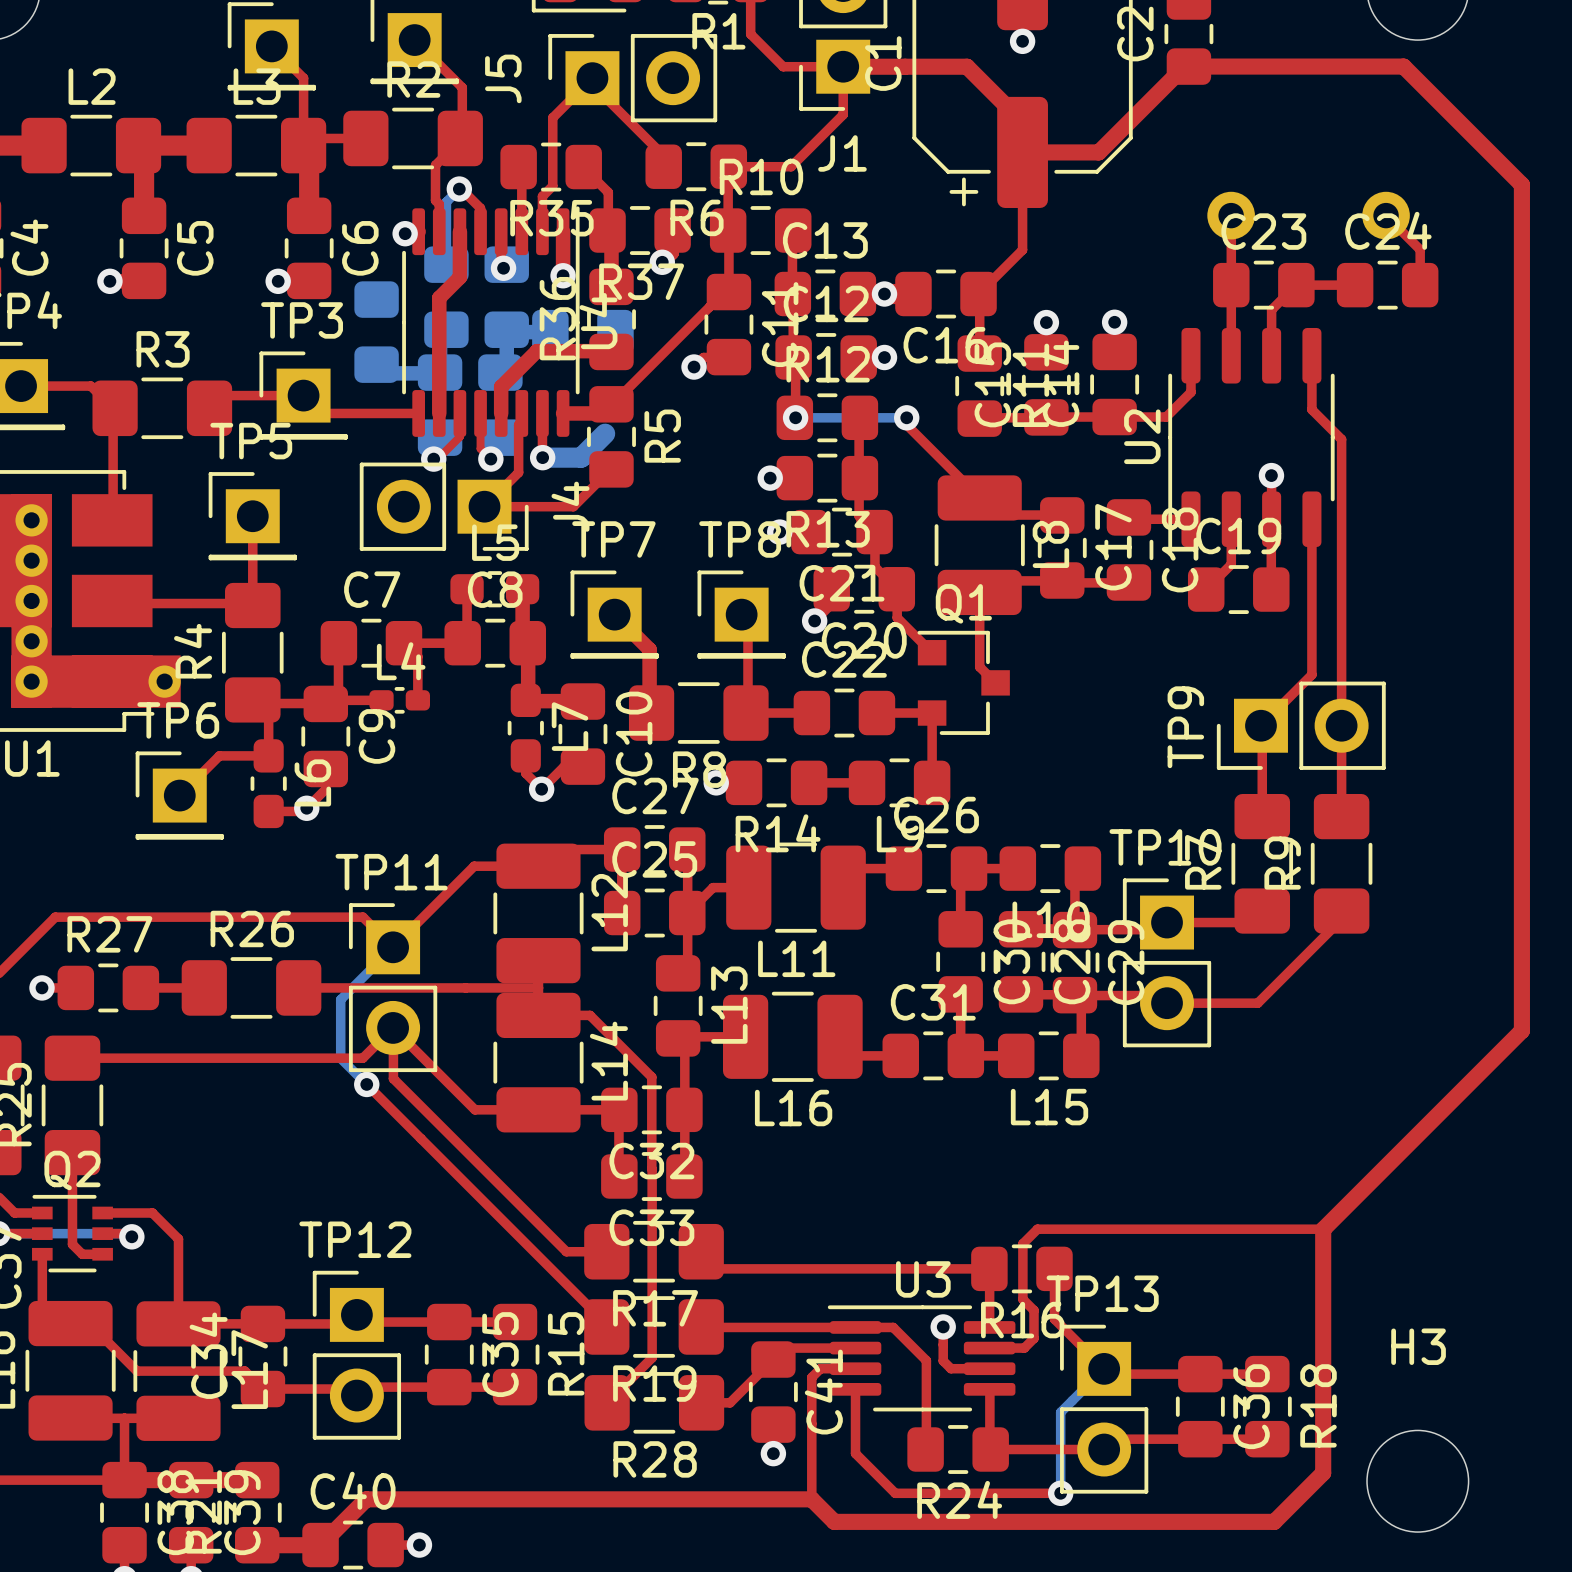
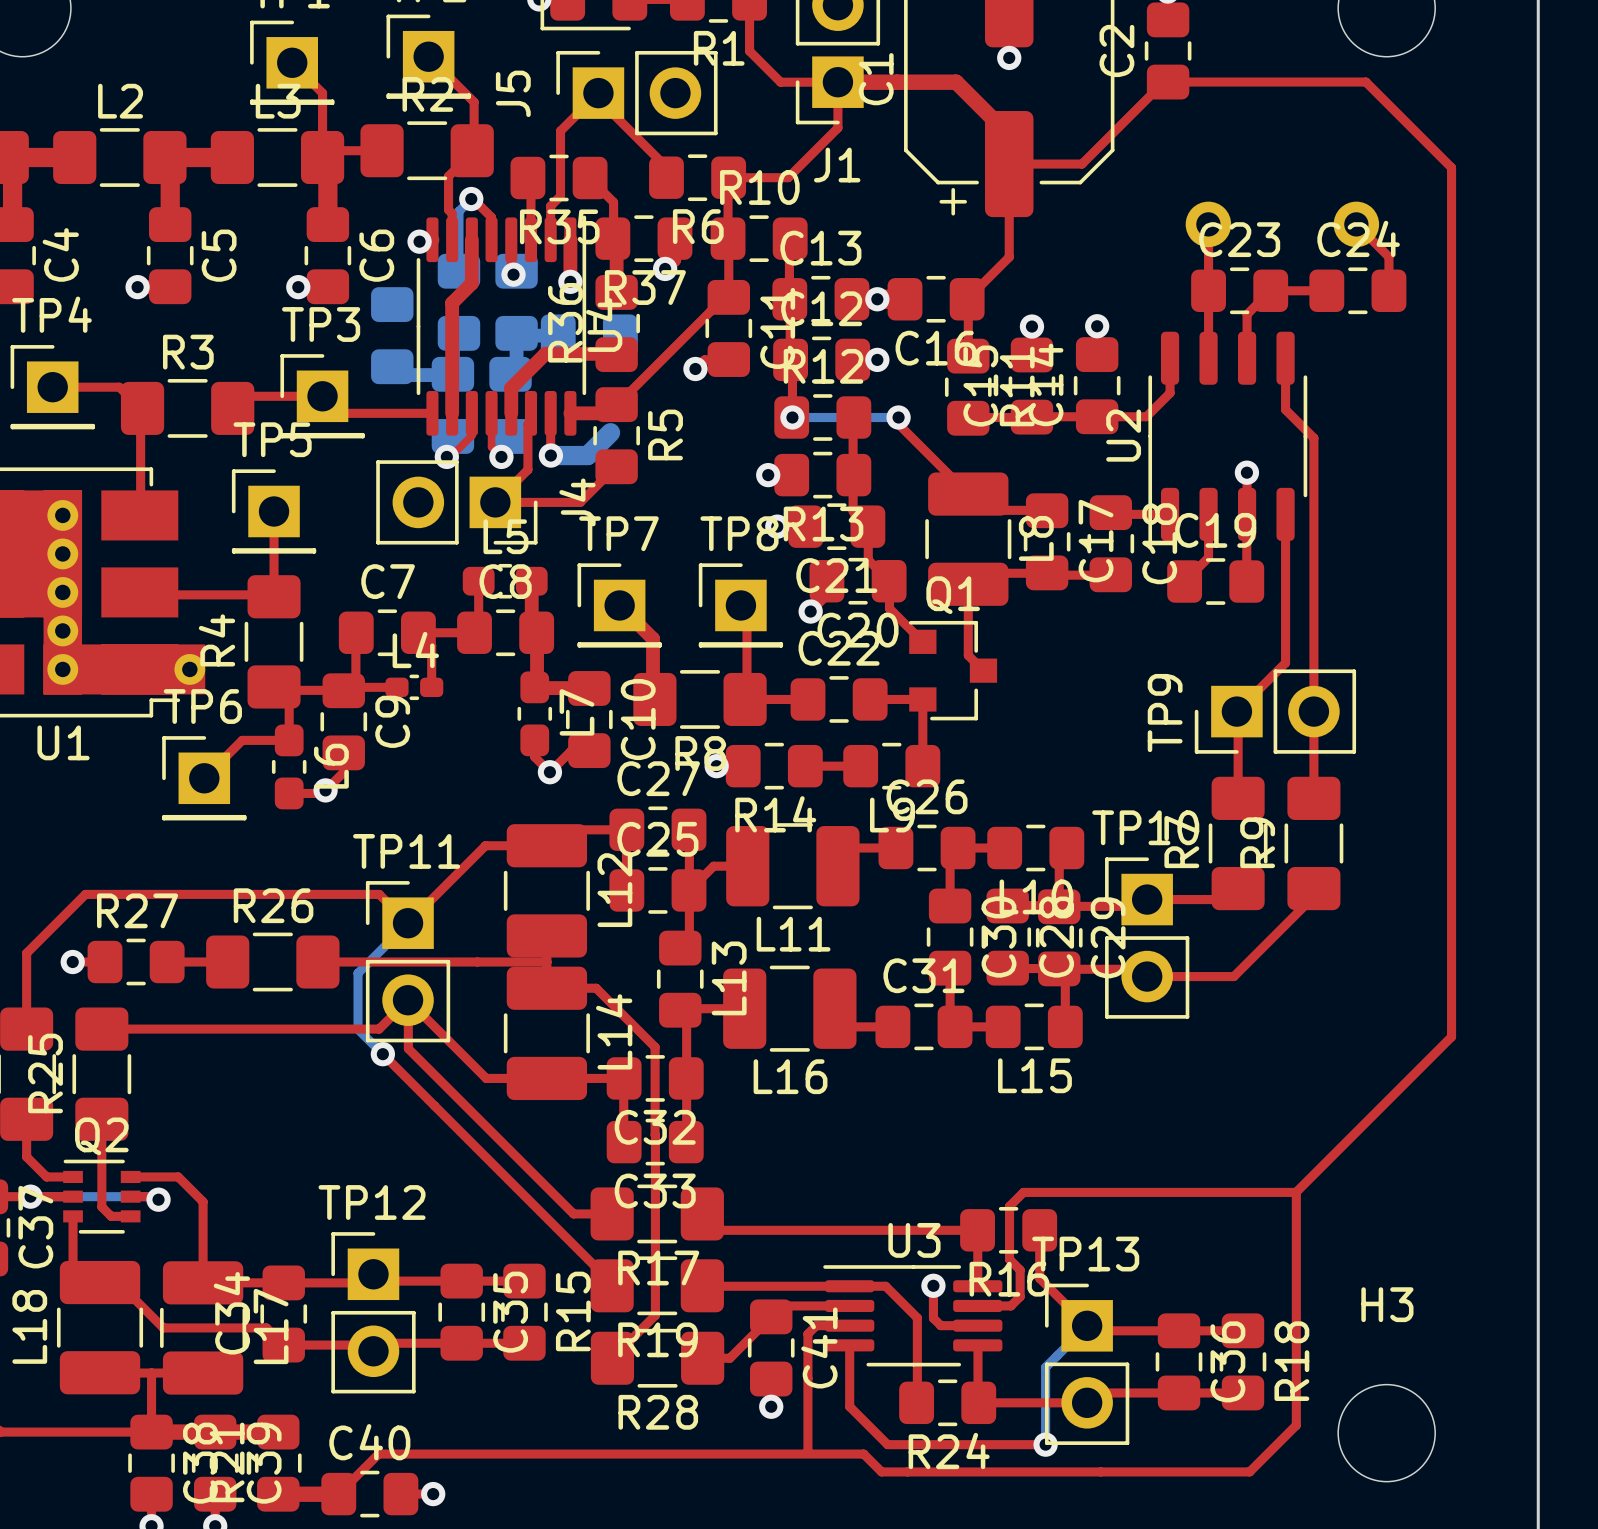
top track width: thick (1184, 66) (1098, 152) (1022, 152) -> thin (1164, 82) (1081, 164) (1009, 164)
top track width: thick (1188, 66) (1396, 66) -> thin (1168, 82) (1365, 82)
top track: (1396, 66) (1403, 66) (1521, 184) (1521, 1030) (1323, 1229) -> (1365, 82) (1451, 167) (1451, 1036) (1296, 1192)
top track width: thick (1323, 1229) (1323, 1472) (1274, 1521) (888, 1521) -> thin (1296, 1192) (1296, 1425) (1249, 1471) (881, 1471)
top track: (888, 1521) (834, 1521) (811, 1499) (366, 1499) (320, 1545) -> (881, 1471) (863, 1454) (378, 1454) (338, 1493)

